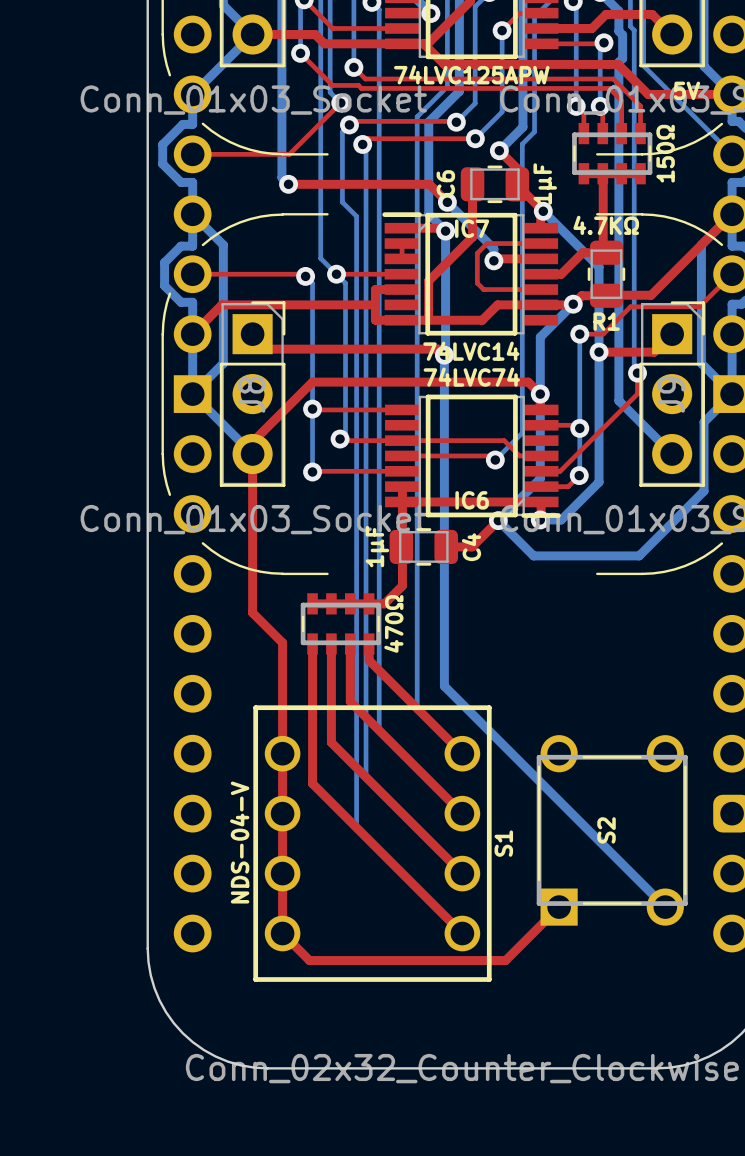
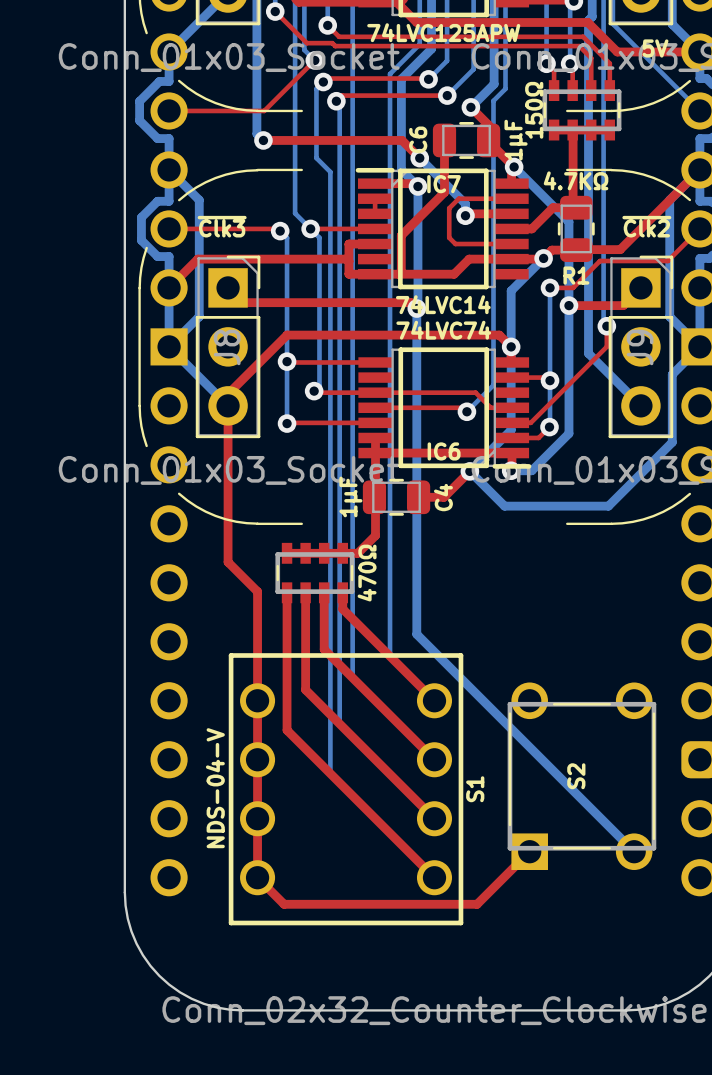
part text position: 150Ω (665, 153) -> 150Ω (534, 110)
text: none -> ~{Clk3} (222, 226)
text: none -> ~{Clk2} (646, 226)

